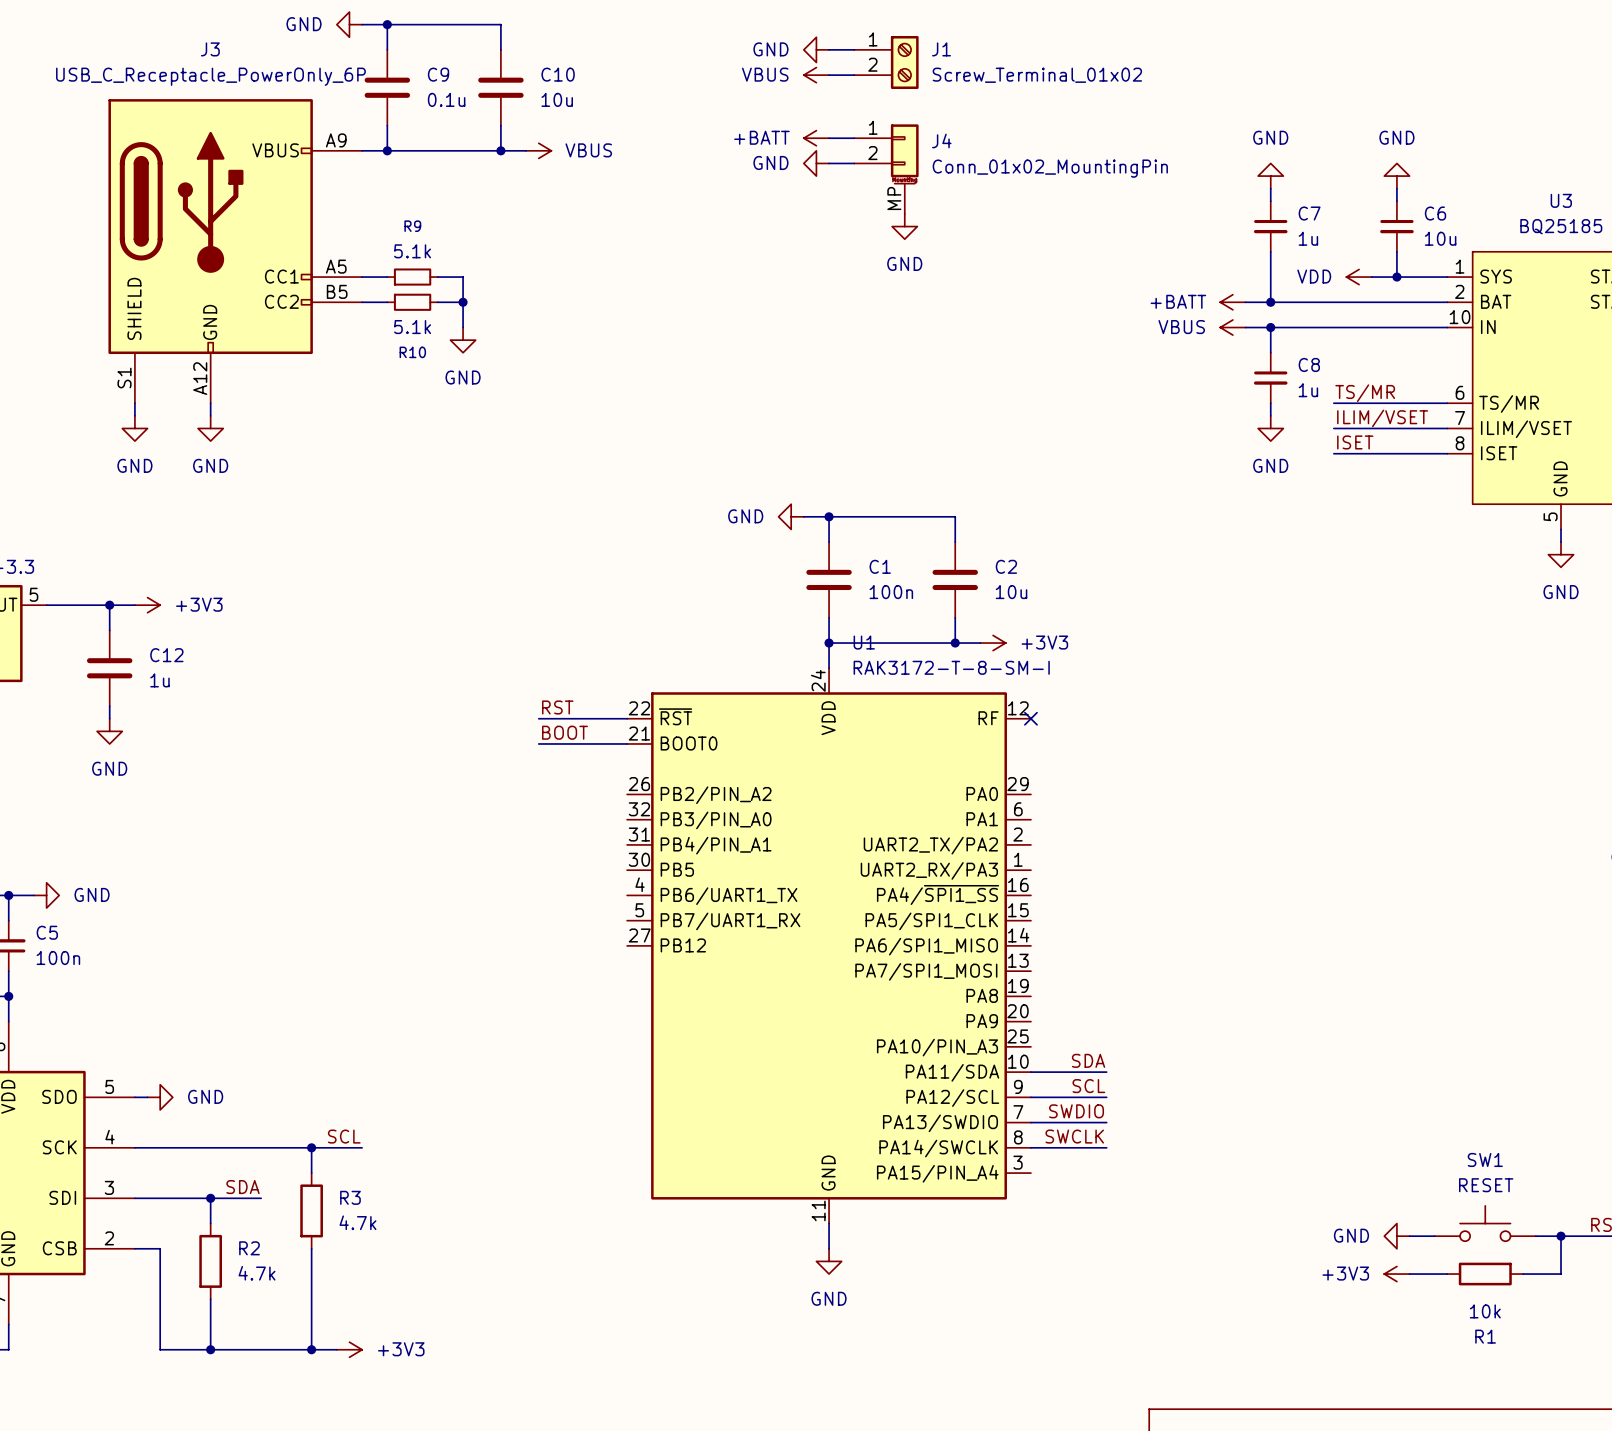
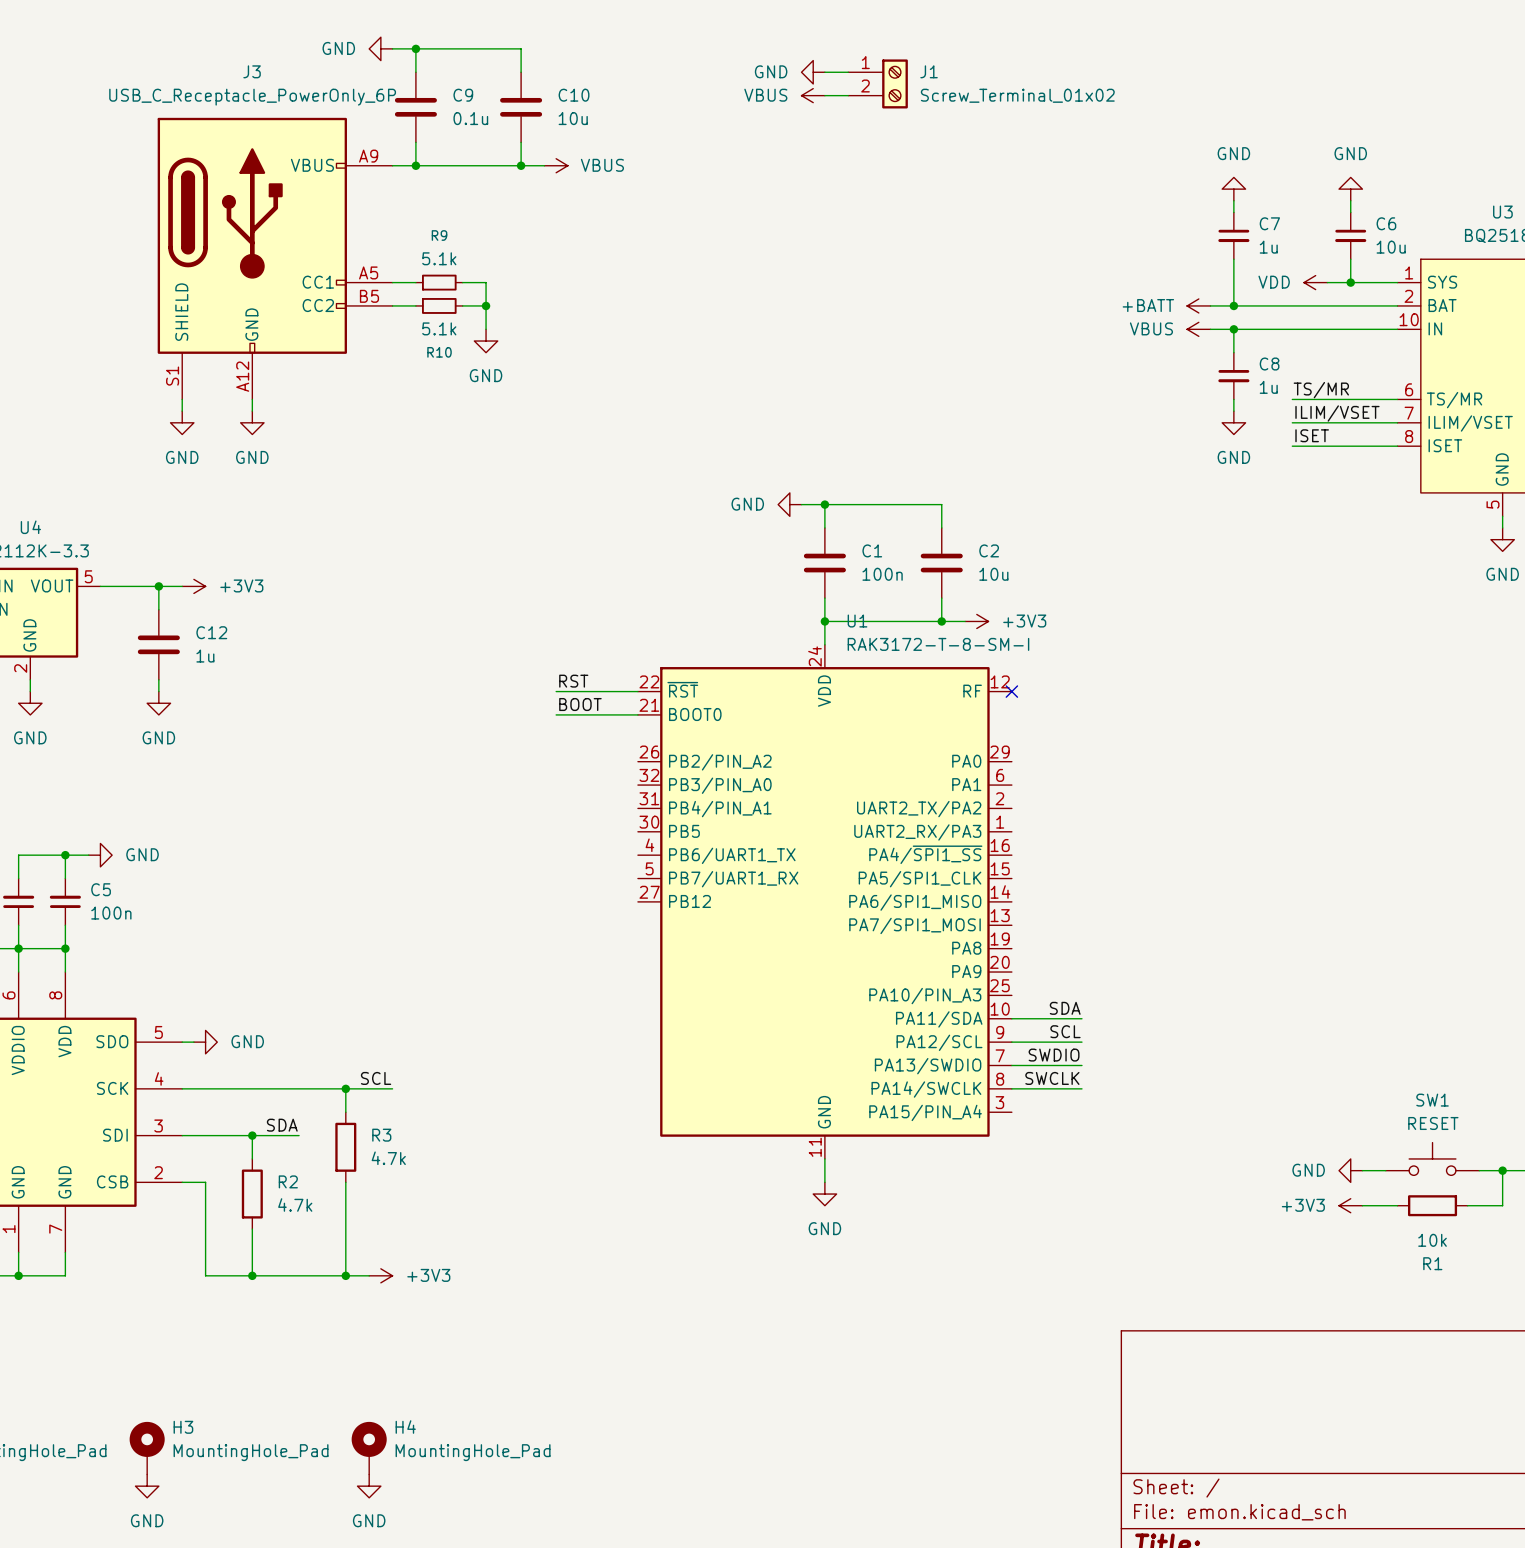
power symbol: +BATT (816, 138) -> none
wire: (829, 138) (854, 138) -> none
power symbol: GND (816, 163) -> none
wire: (829, 163) (854, 163) -> none
J4: Conn_01x02_MountingPin (886, 169) -> none
power symbol: GND (904, 226) -> none

